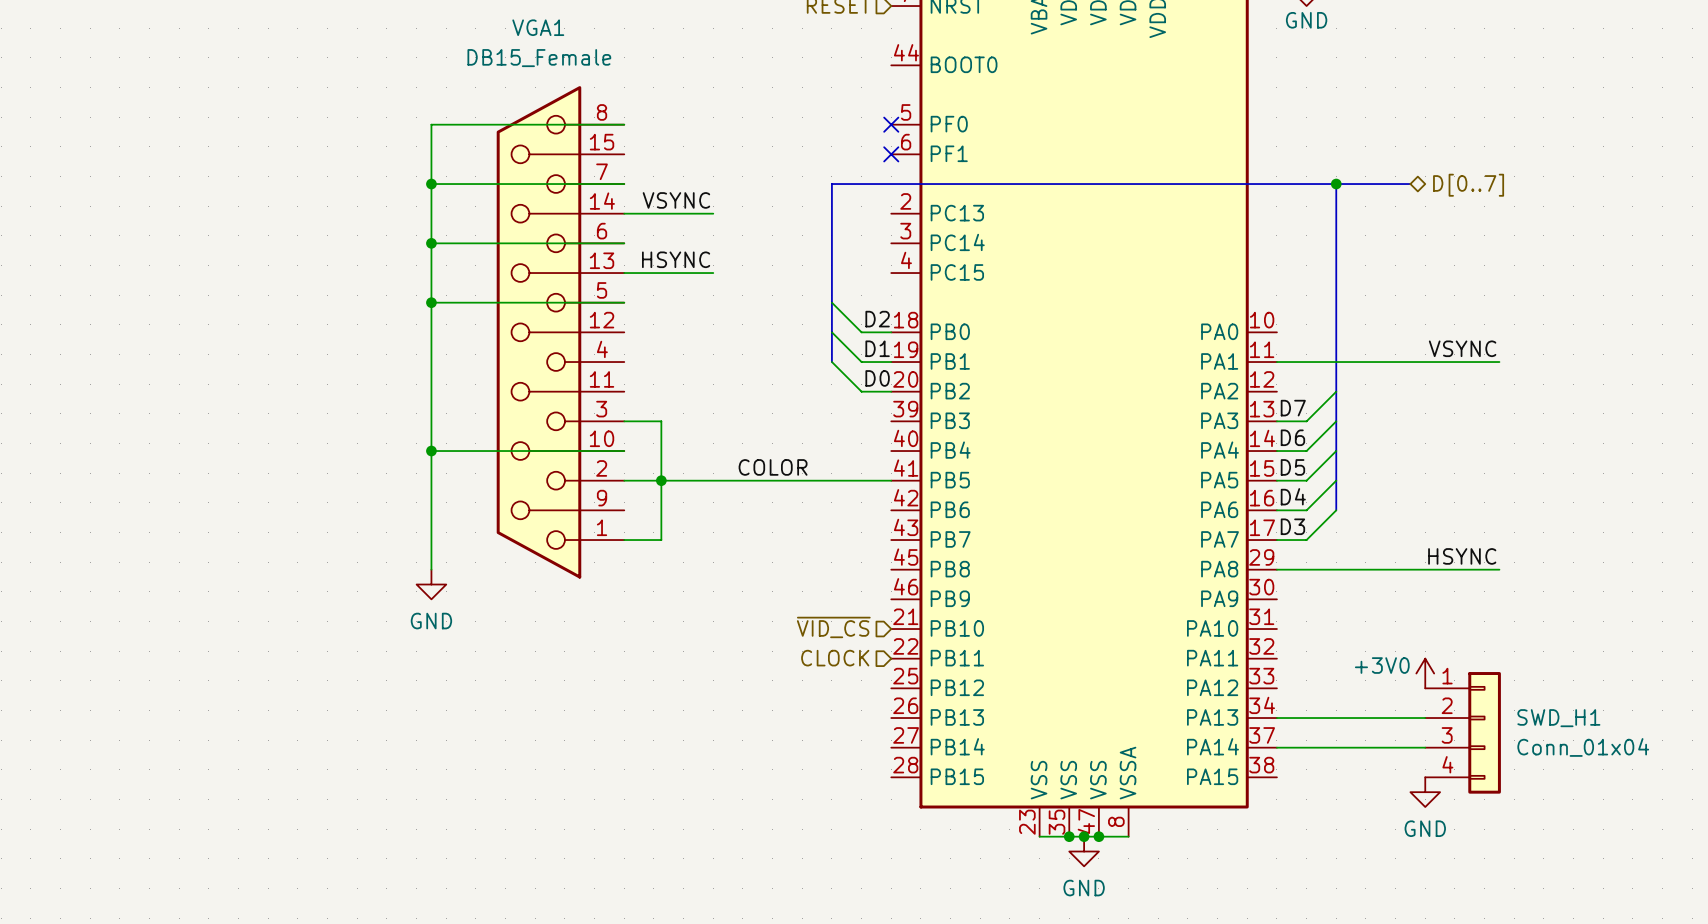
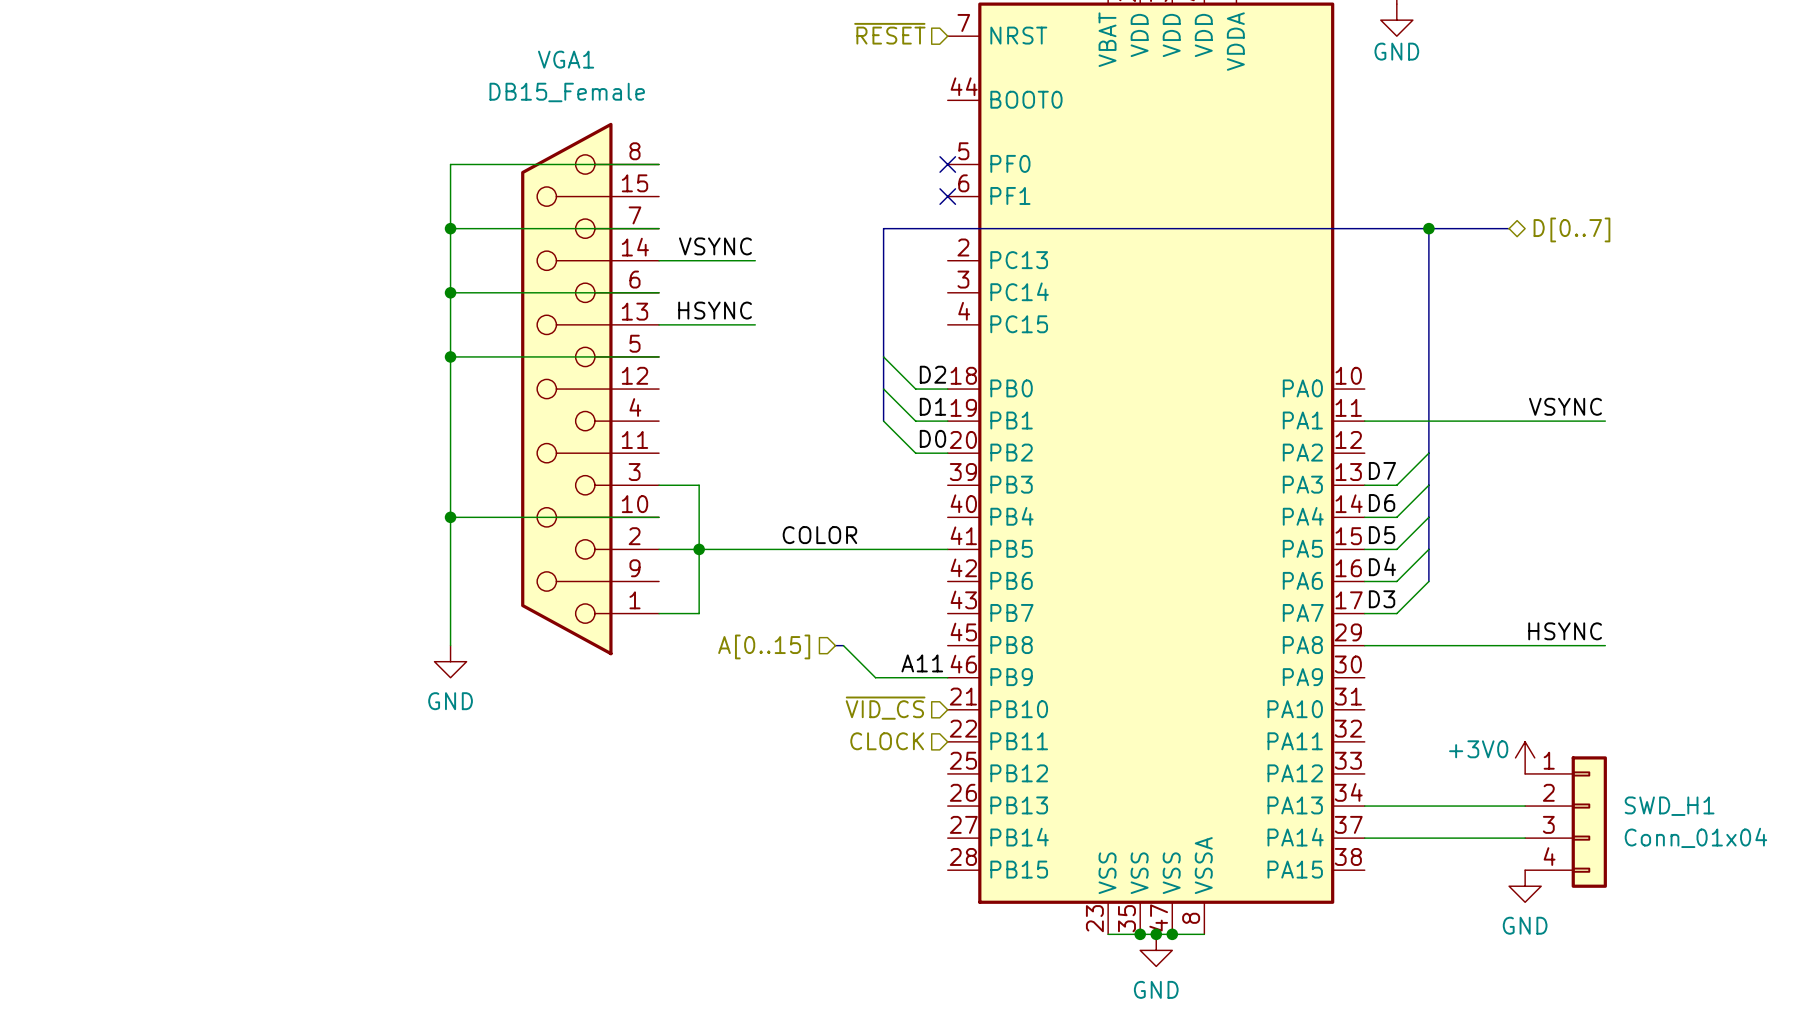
bus: none -> (835, 645) (843, 645)
wire: none -> (843, 645) (875, 677) (947, 677)
hierarchical label: none -> A[0..15] (764, 646)
label: none -> A11 (922, 663)

